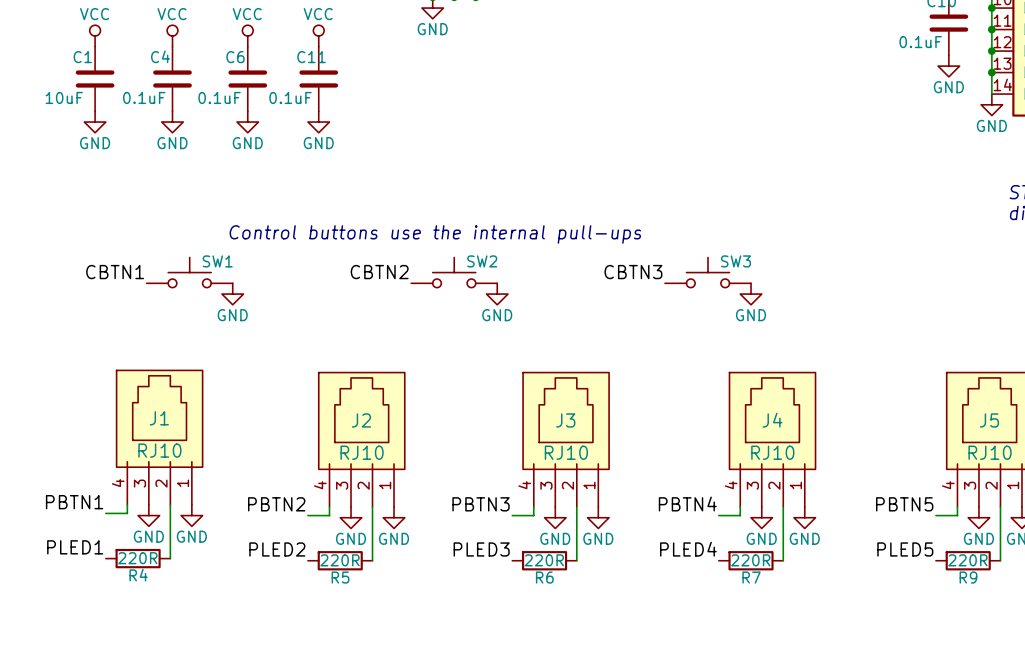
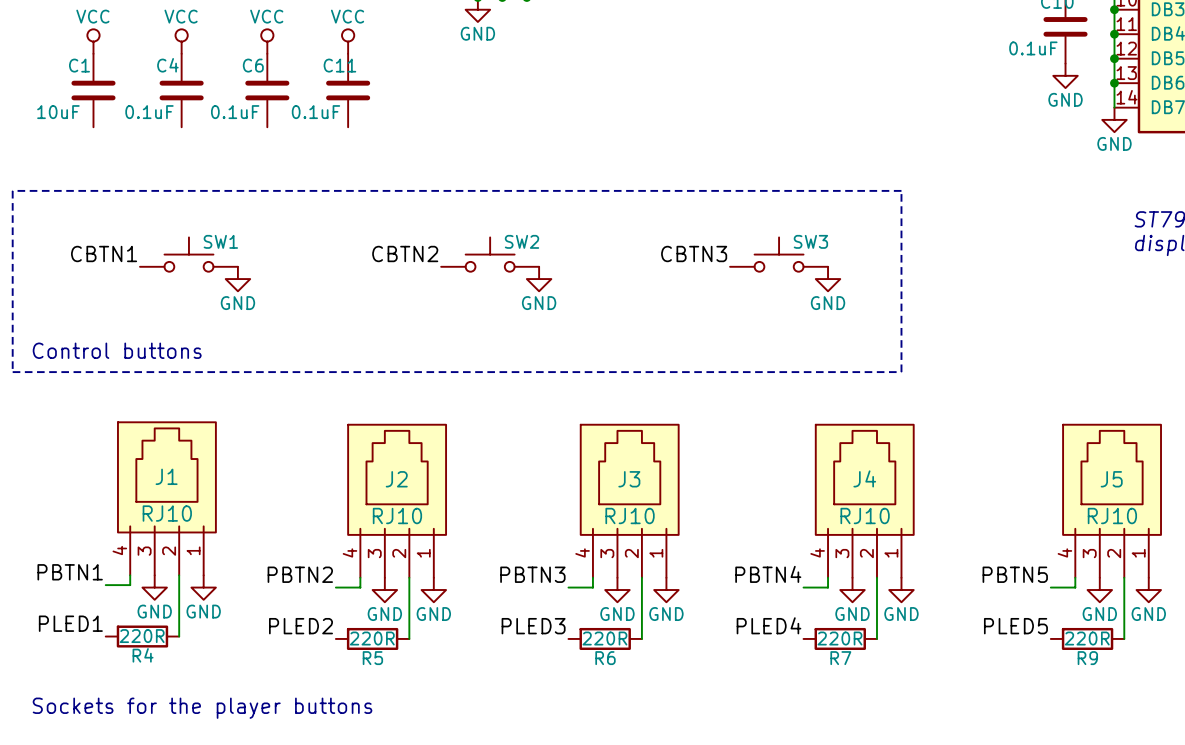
power symbol: GND (95, 122) -> none
power symbol: GND (172, 122) -> none
power symbol: GND (247, 122) -> none
power symbol: GND (318, 122) -> none
line: none -> (12, 190) (12, 372) (901, 372) (901, 190) (12, 190)
text: Control buttons use the internal pull-ups (435, 234) -> none
label position: CBTN1 (115, 272) -> CBTN1 (104, 253)
SW1 position: (189, 272) -> (188, 254)
label position: CBTN2 (379, 272) -> CBTN2 (405, 253)
SW2 position: (454, 272) -> (490, 254)
label position: CBTN3 (633, 272) -> CBTN3 (694, 253)
SW3 position: (707, 272) -> (779, 254)
power symbol position: GND (232, 294) -> GND (237, 279)
power symbol position: GND (497, 294) -> GND (539, 279)
power symbol position: GND (751, 294) -> GND (828, 279)
text: none -> Control buttons (117, 350)
text: none -> Sockets for the player buttons (202, 708)

